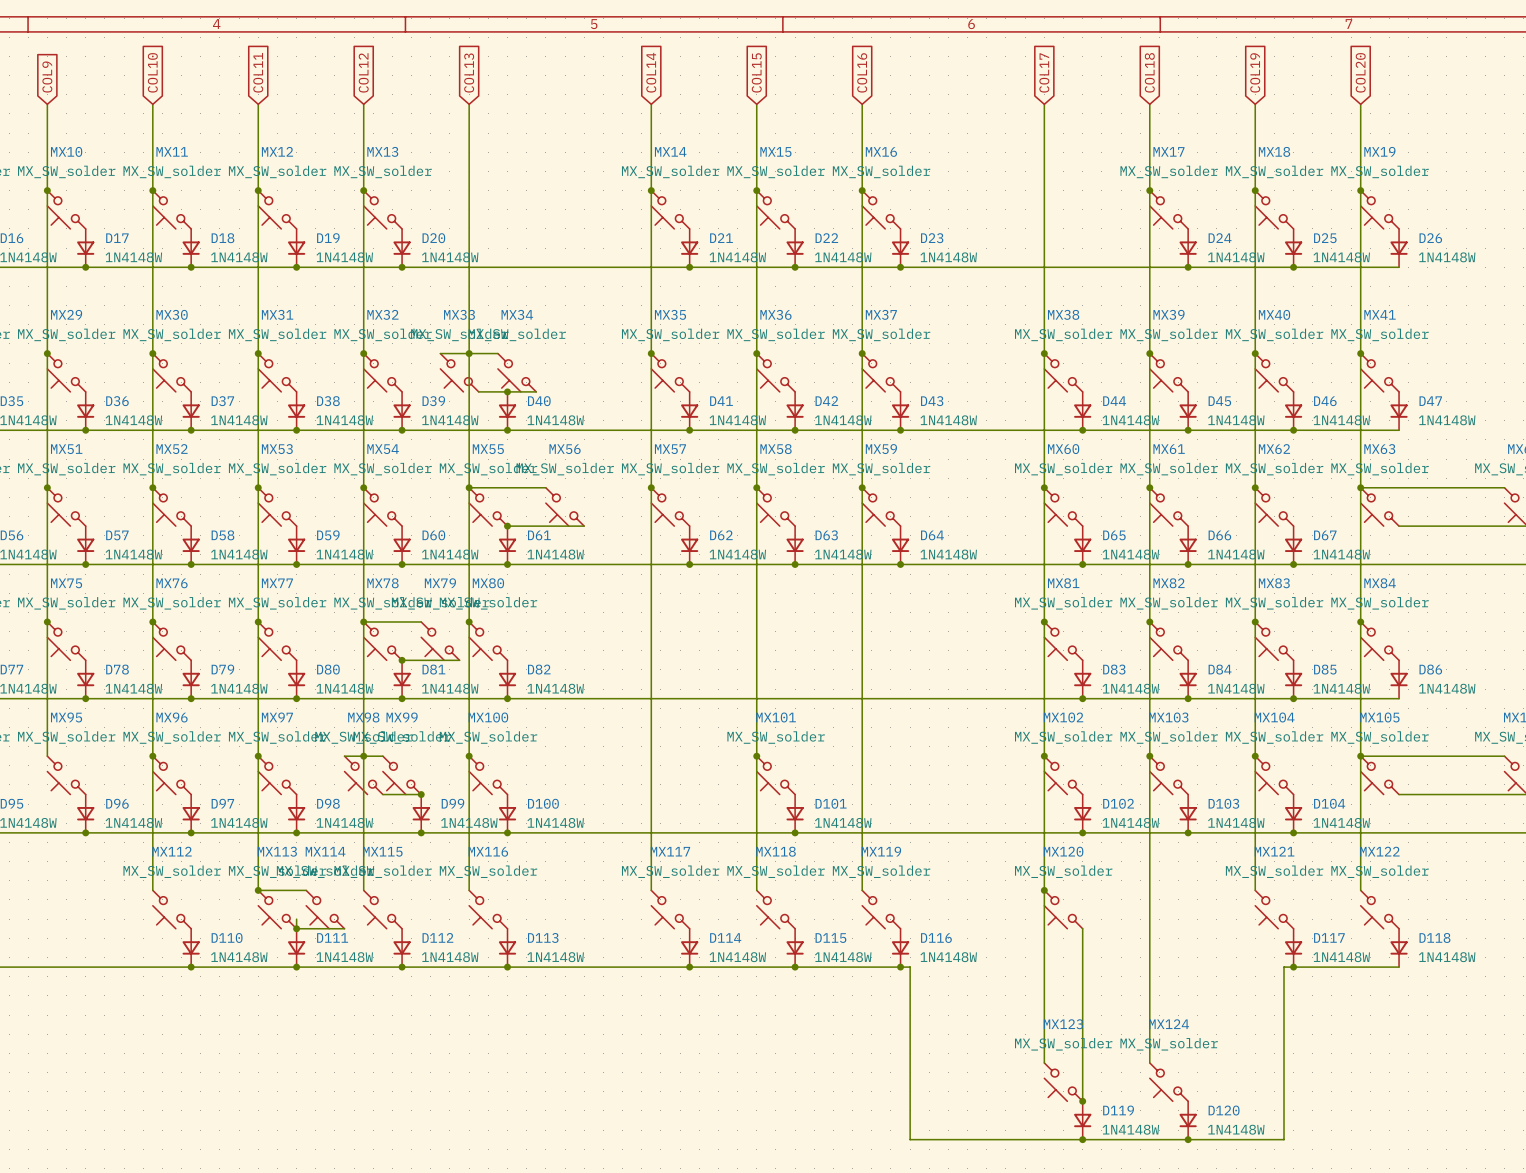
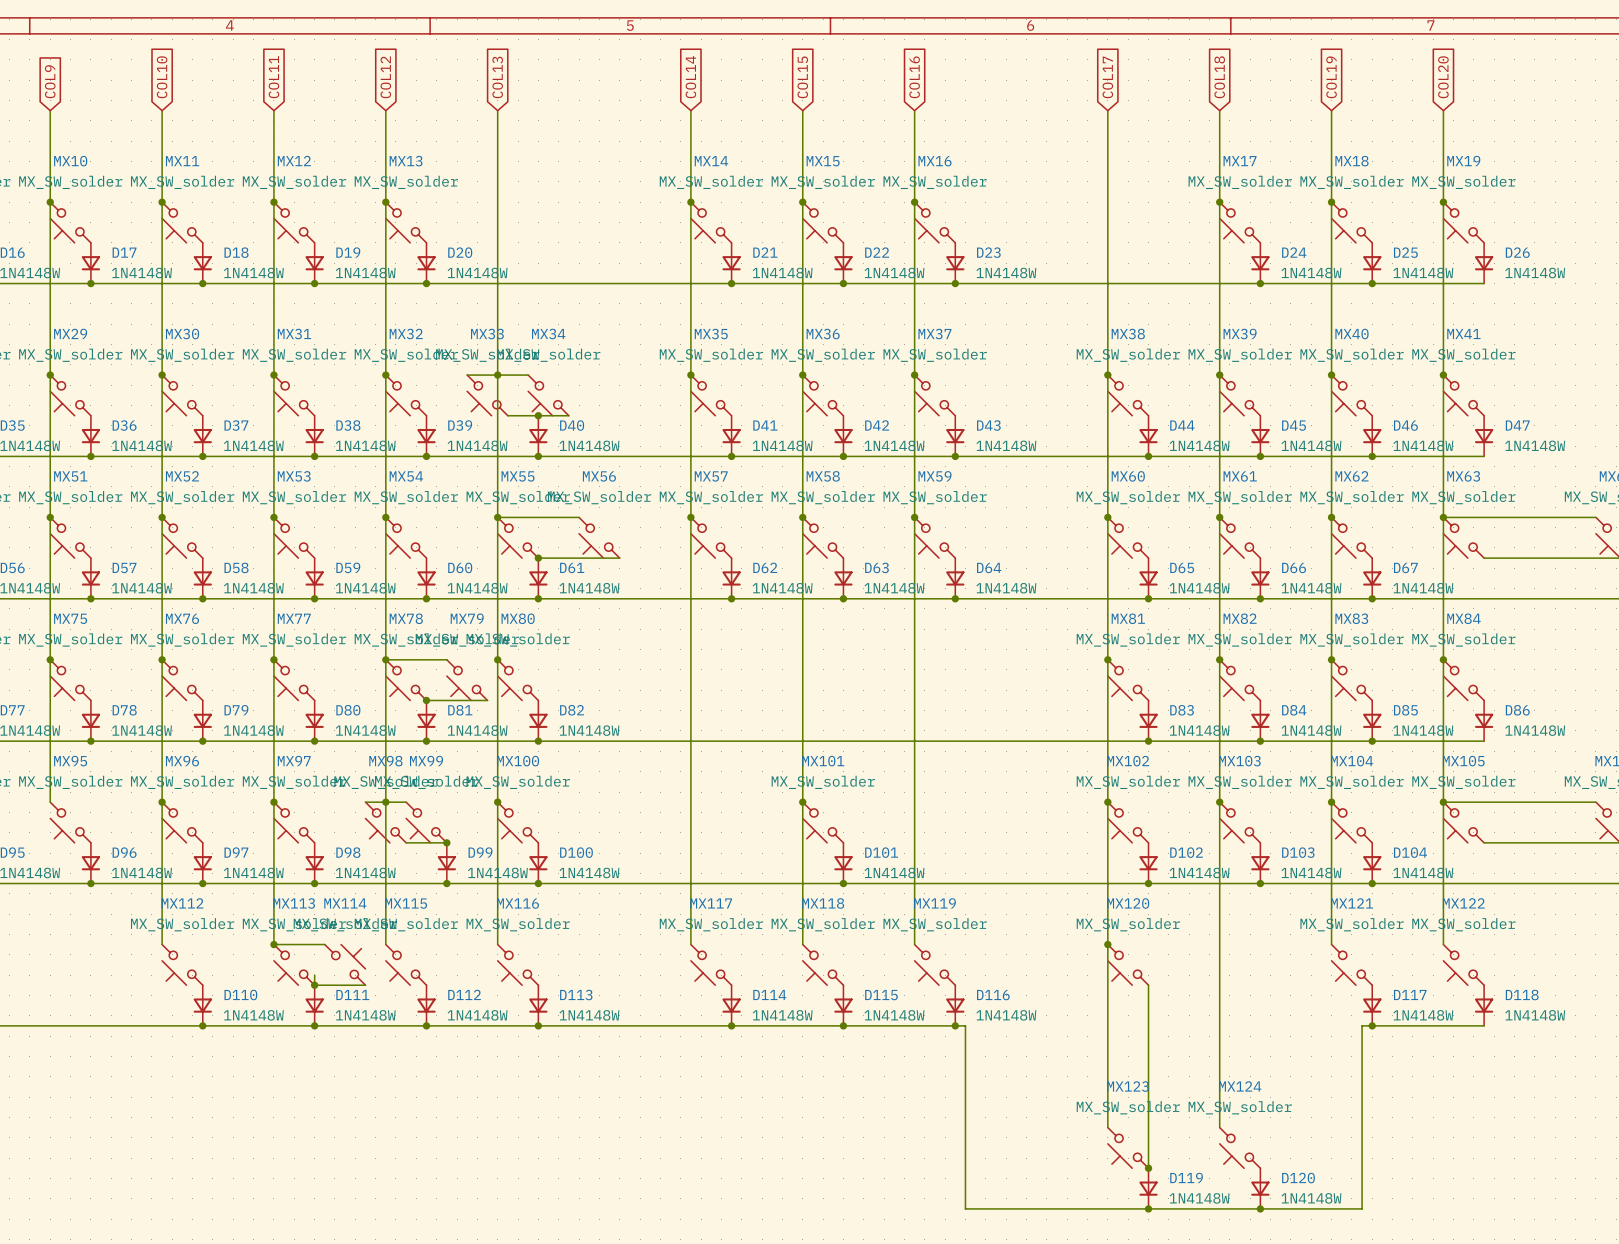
MX114 rotation: 0° (325, 909) -> 180° (345, 964)

